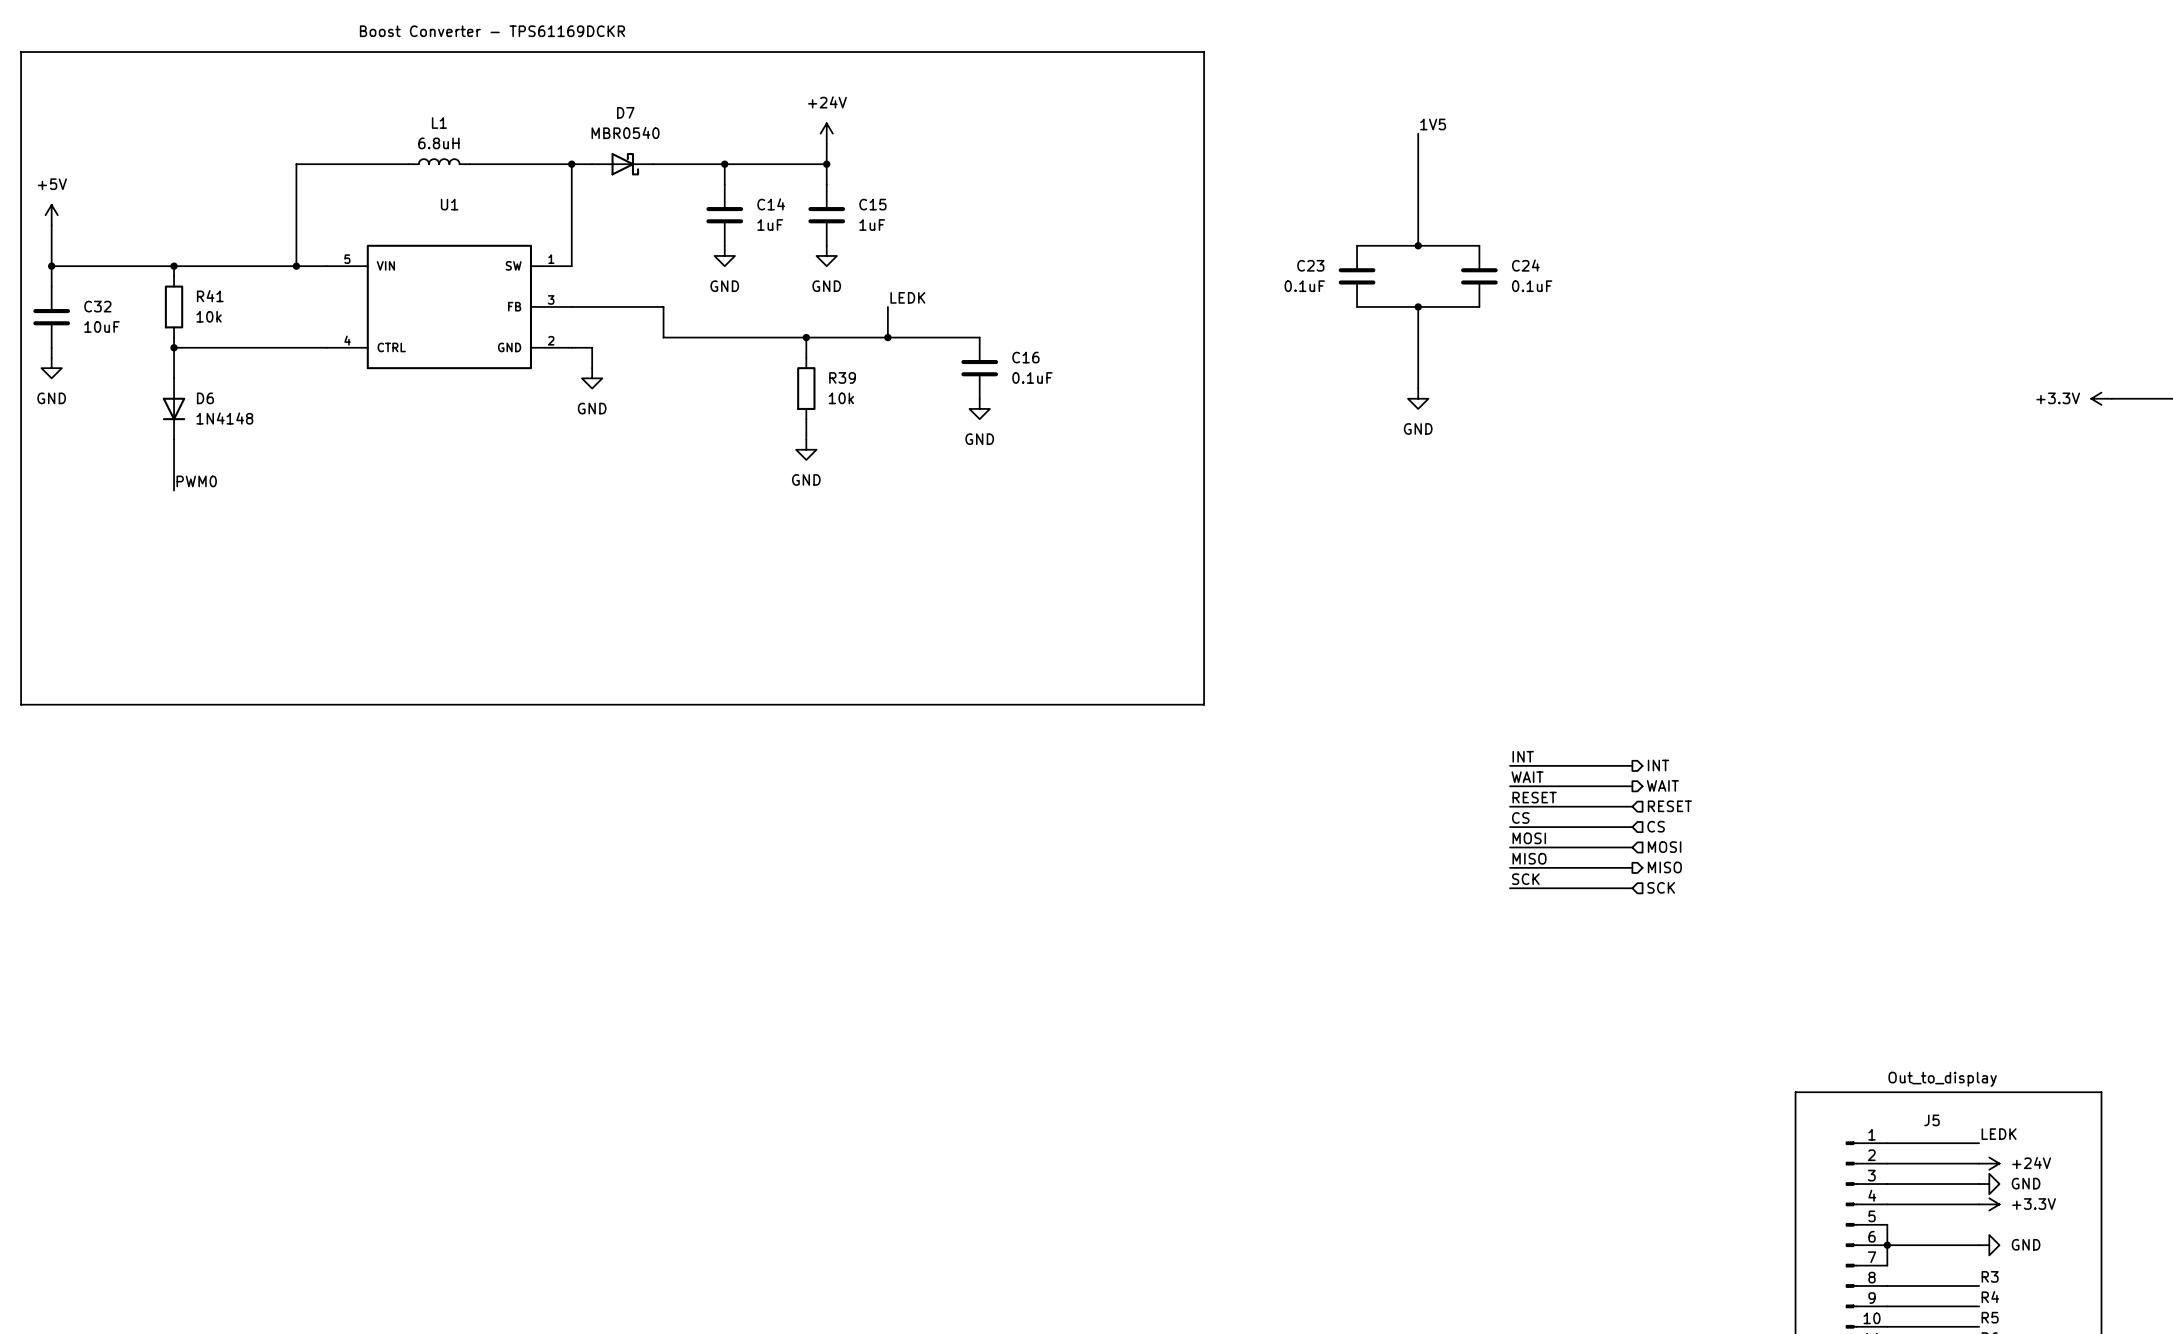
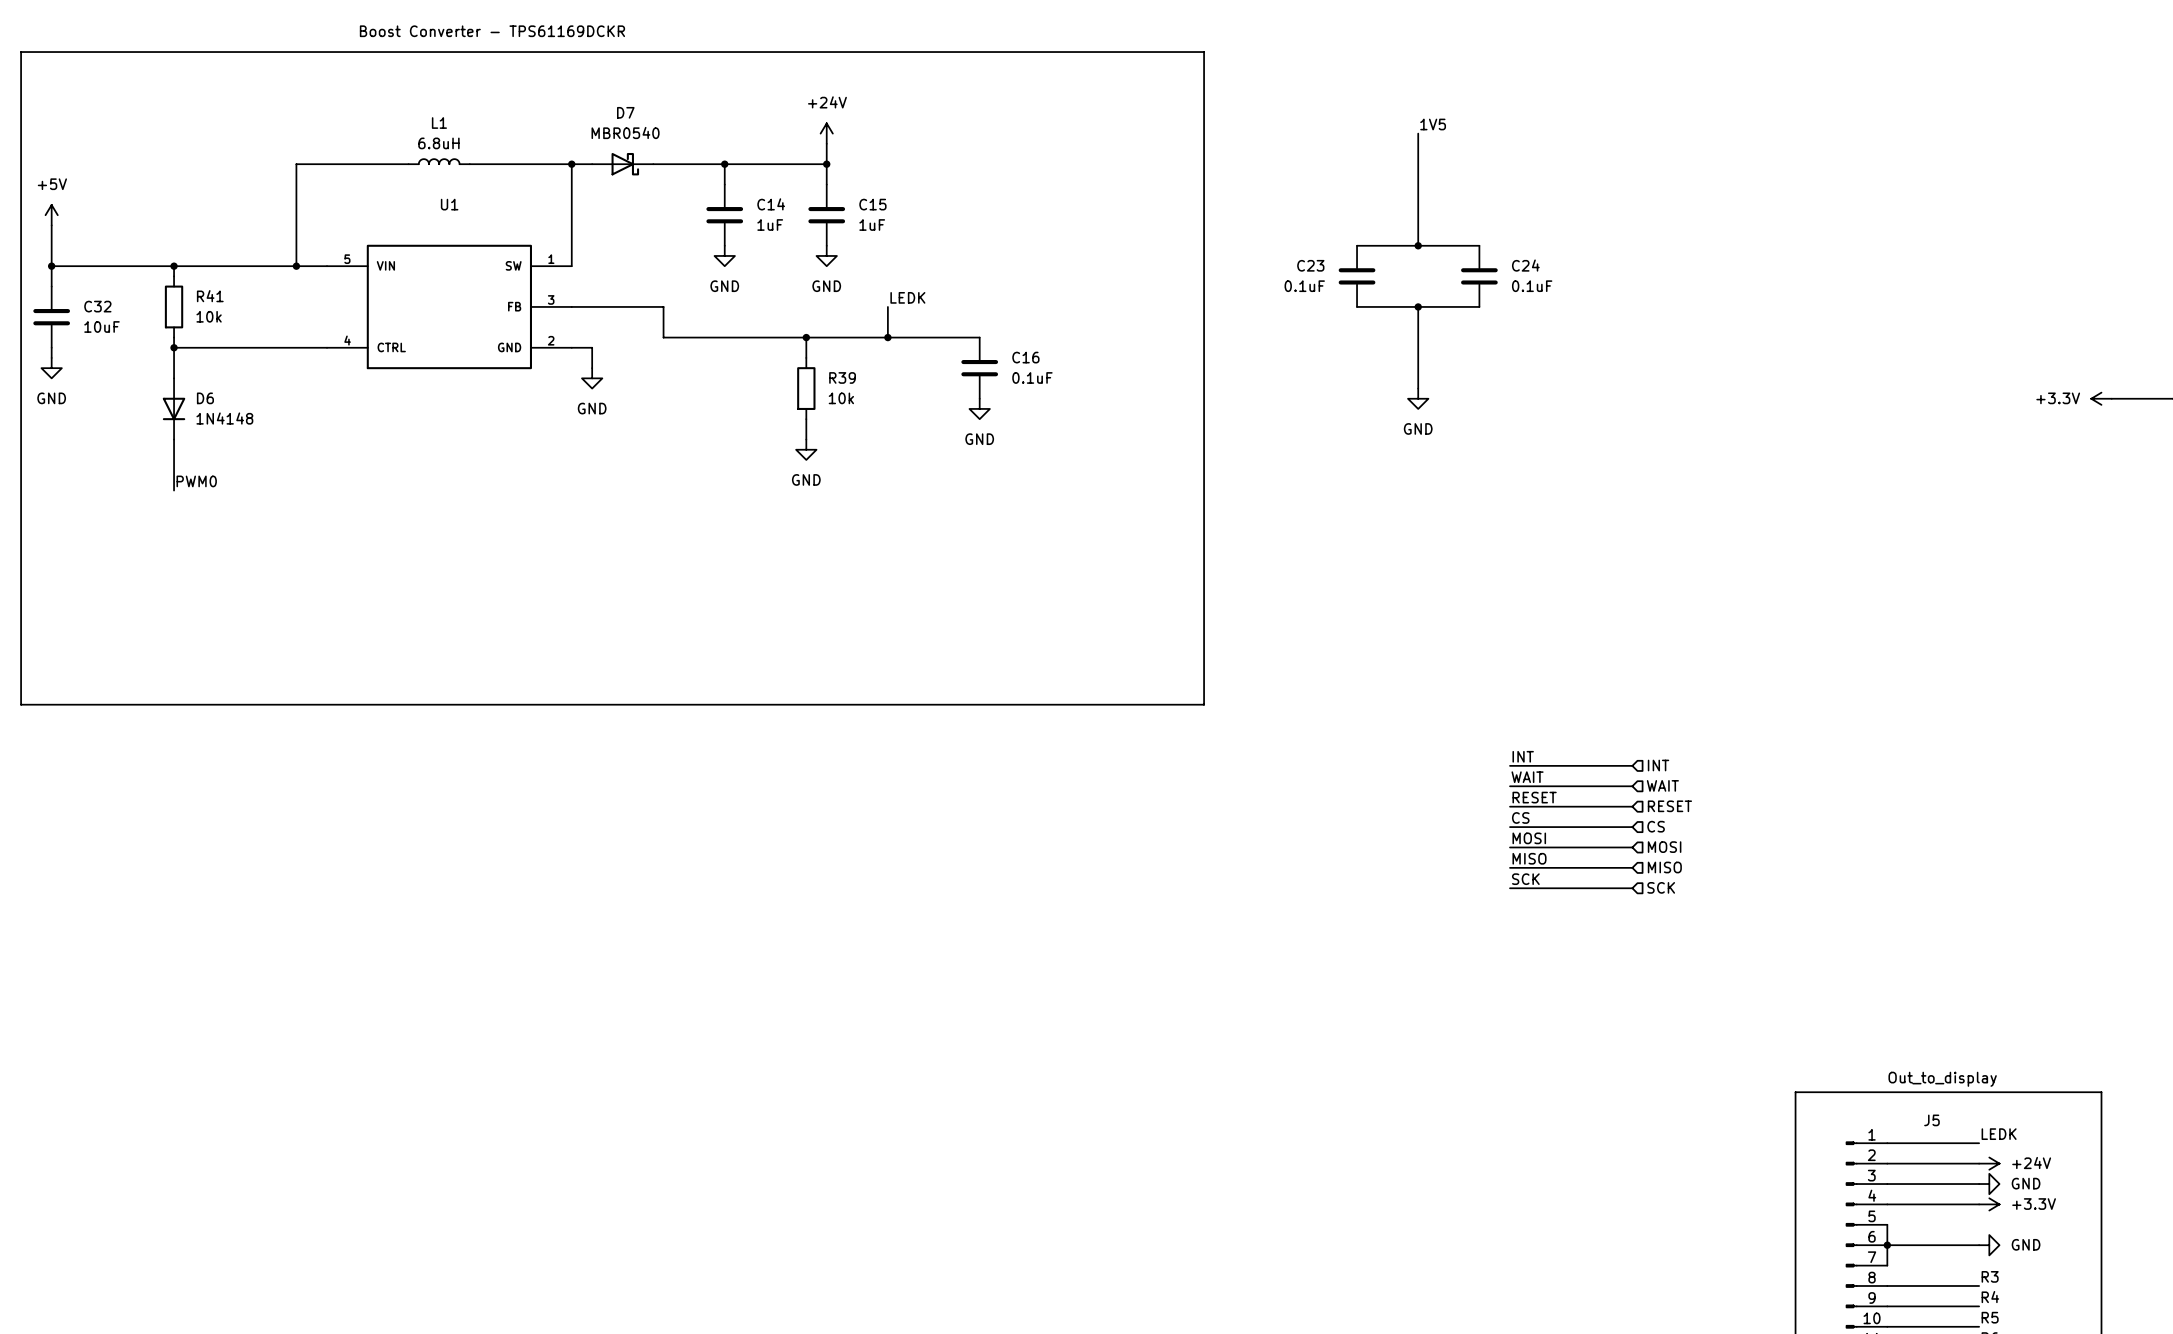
hierarchical label shape: output (1658, 765) -> input (1658, 765)
hierarchical label shape: output (1662, 785) -> input (1662, 785)
hierarchical label shape: output (1664, 867) -> input (1664, 867)

